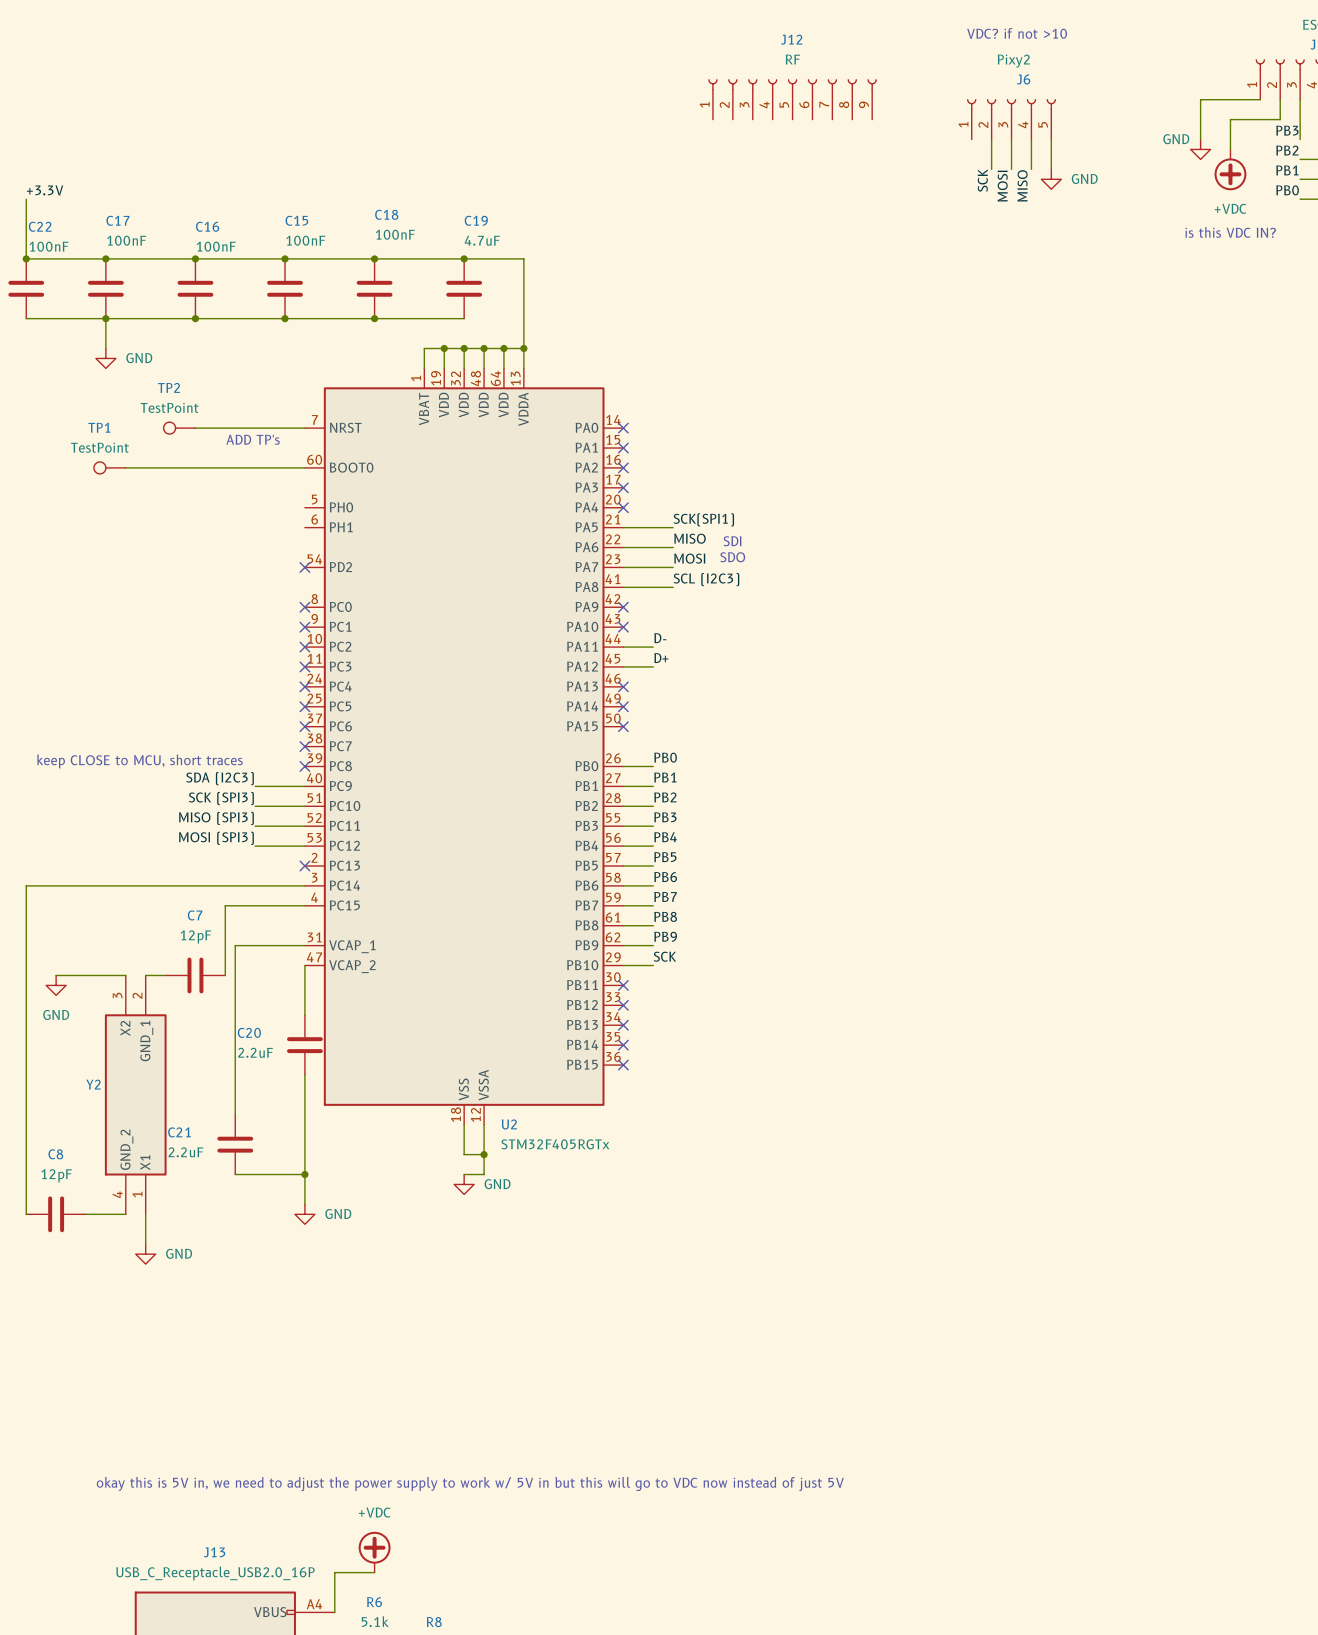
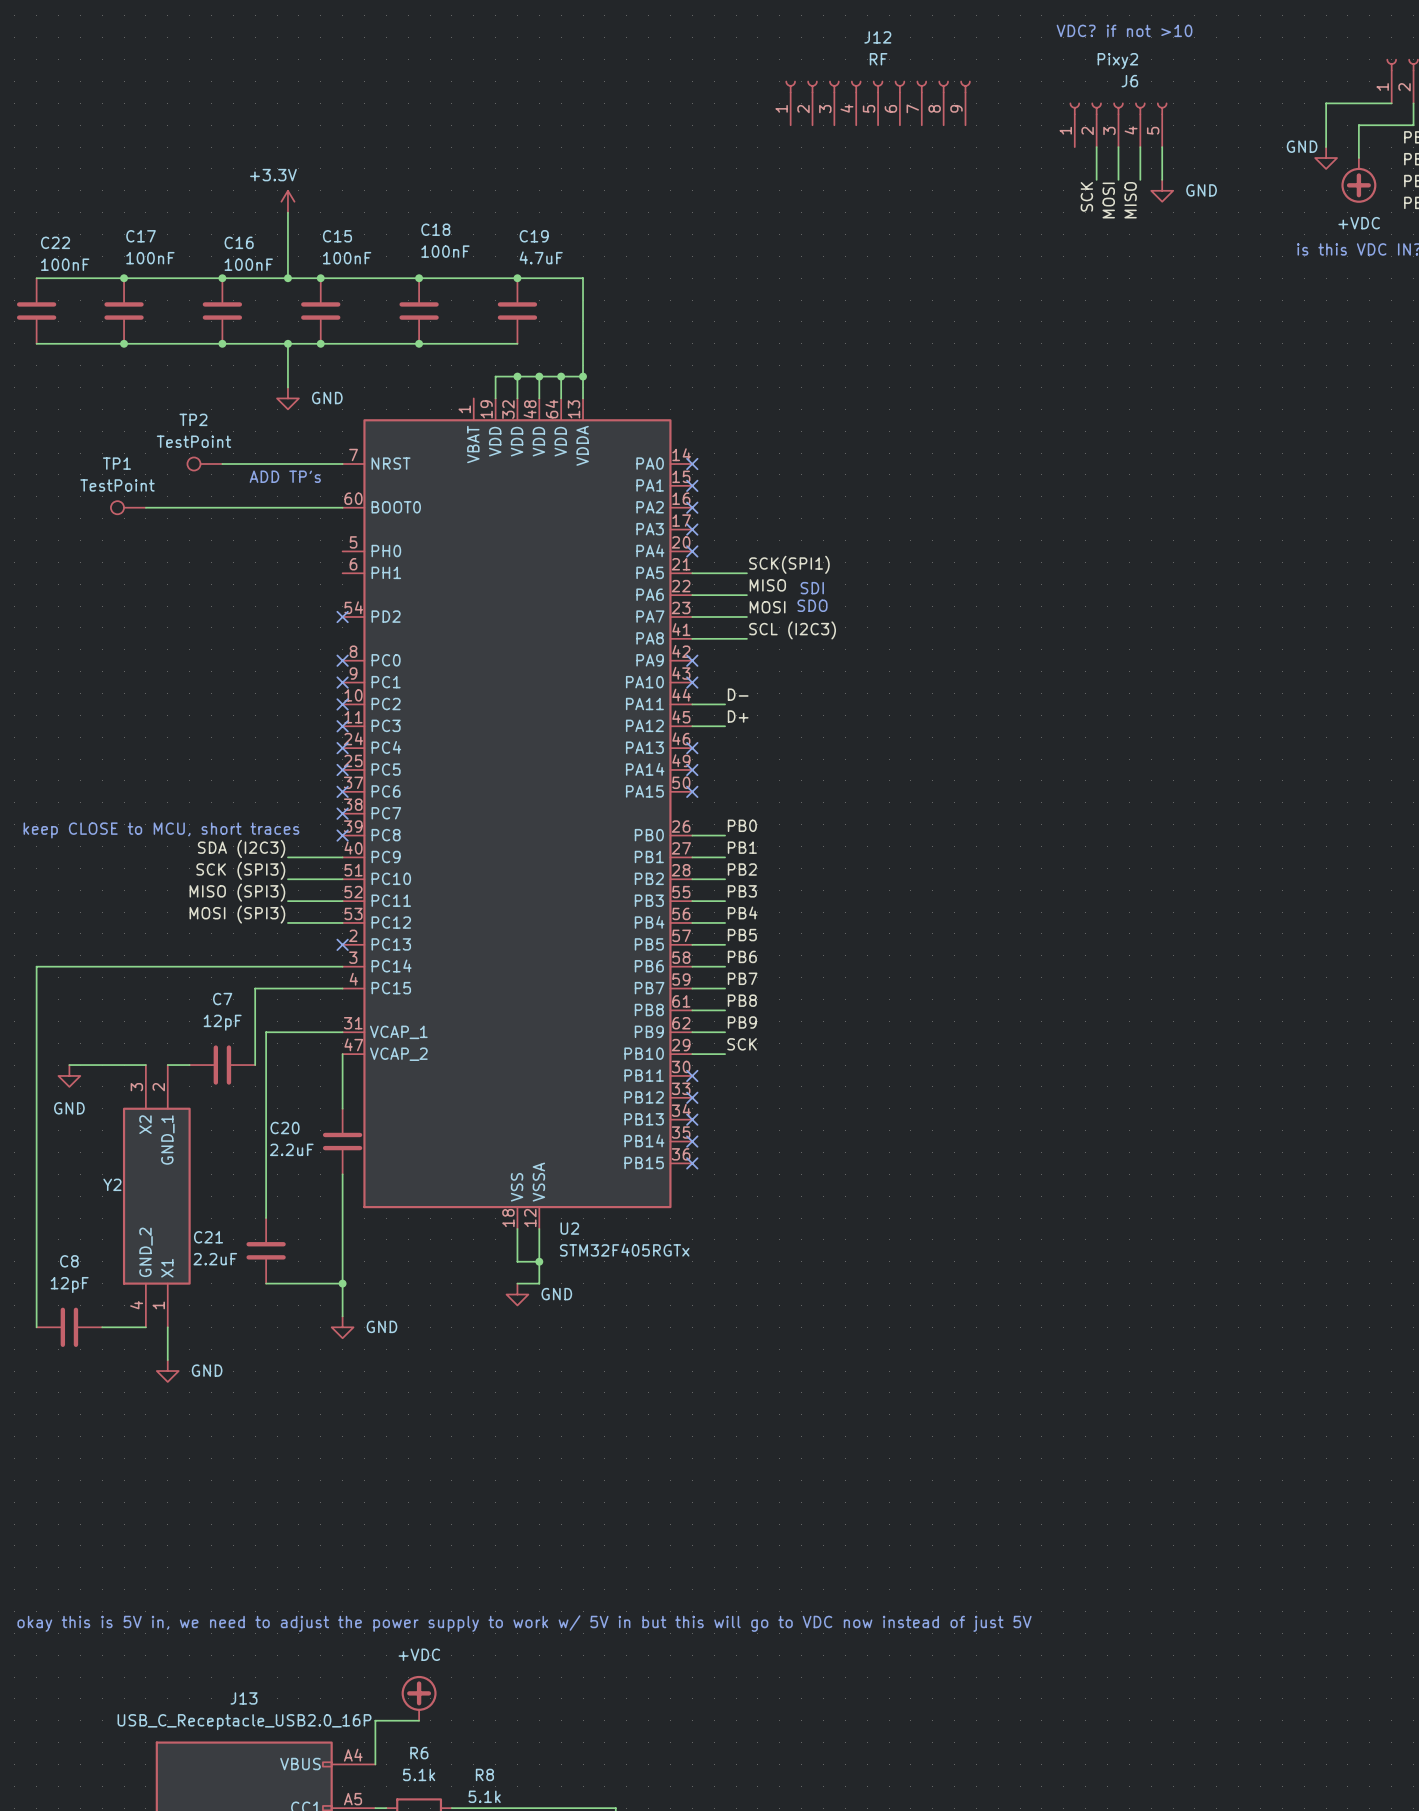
power symbol: none -> +3.3V (287, 201)
label: +3.3V (45, 190) -> none
wire: (26, 199) (26, 258) -> none
wire: none -> (287, 212) (287, 278)
junction: (26, 258) -> none
junction: none -> (287, 278)
wire: (105, 318) (105, 348) -> none
wire: none -> (287, 343) (287, 387)
junction: none -> (287, 343)
wire: (444, 348) (424, 348) (424, 368) -> none
junction: (444, 348) -> none
power symbol position: GND (105, 358) -> GND (287, 398)

